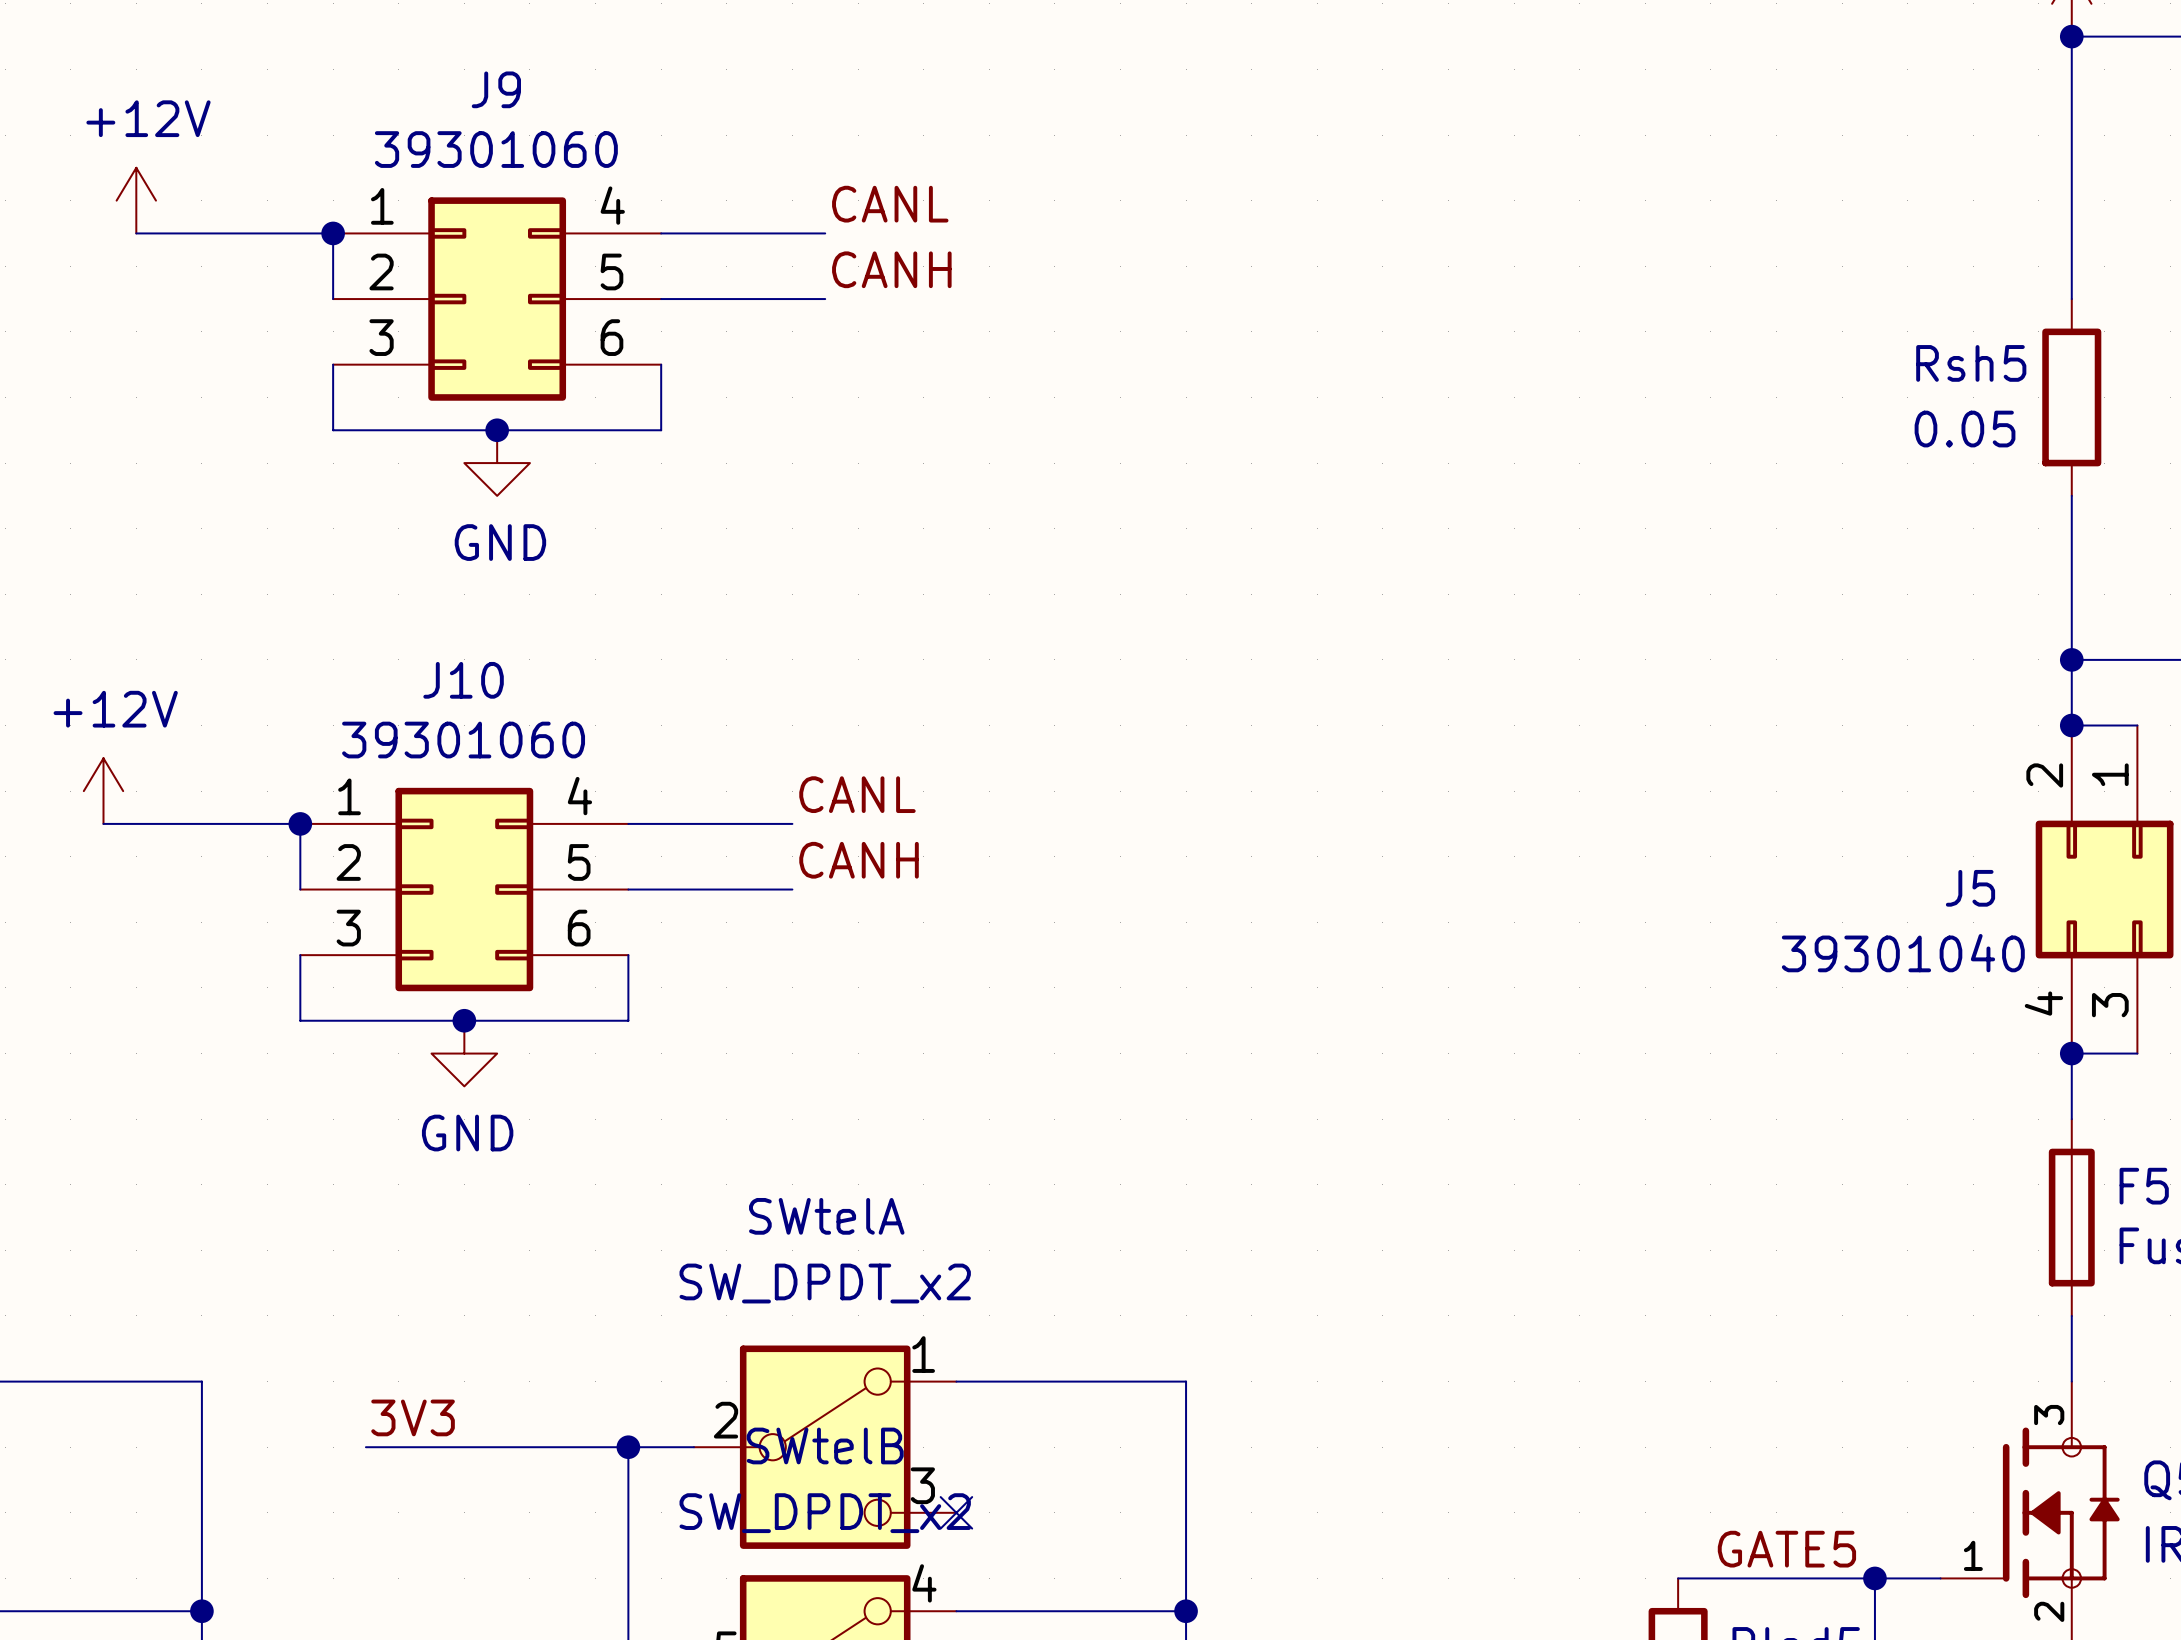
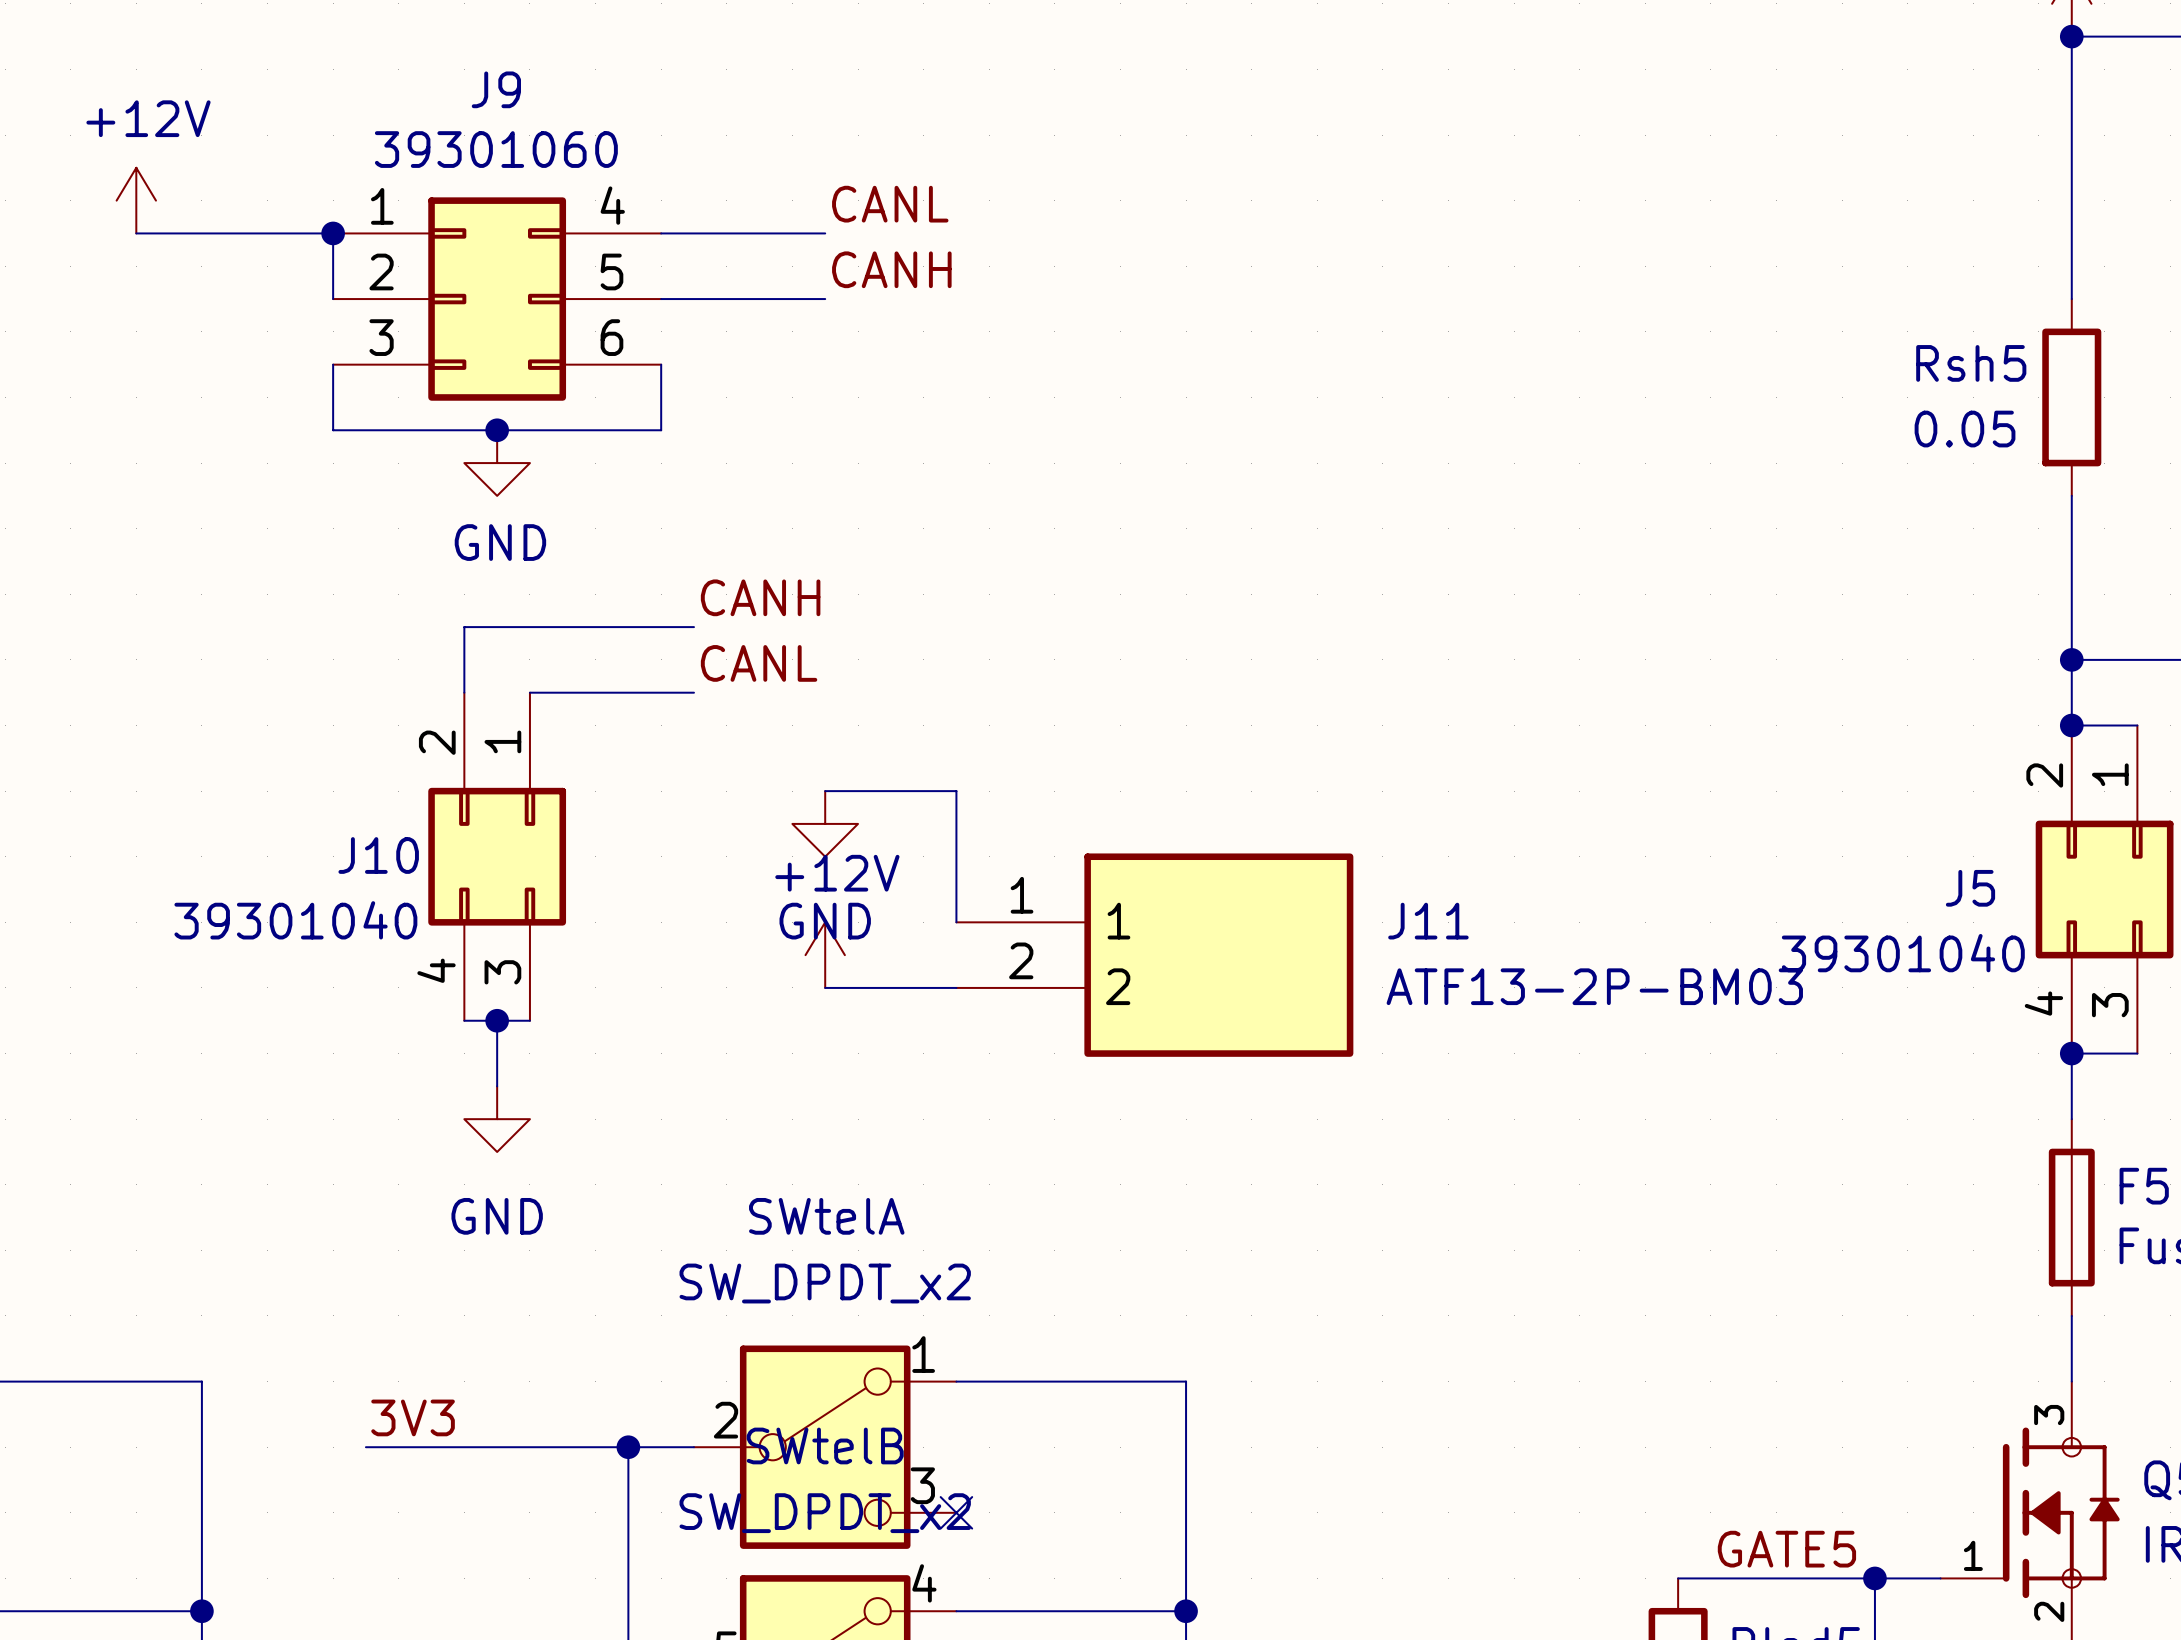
wire: none -> (693, 627) (464, 627) (464, 692)
J10 name position: J10 (463, 680) -> J10 (378, 855)
J10 value: 39301060 (463, 740) -> 39301040 (295, 920)
J10 symbol: [300, 787, 629, 992] -> [428, 692, 567, 1021]
power symbol: +12V (103, 791) -> none
wire: none -> (825, 791) (956, 791) (956, 922)
label position: CANL (857, 794) -> CANL (759, 663)
wire: (103, 823) (300, 823) (300, 889) -> none
junction: (300, 823) -> none
wire: (628, 823) (792, 823) -> (529, 692) (693, 692)
power symbol: none -> GND (825, 823)
label position: CANH (859, 860) -> CANH (760, 597)
wire: (628, 889) (792, 889) -> none
wire: (300, 955) (300, 1020) (464, 1020) -> none
wire: (628, 955) (628, 1020) (529, 1020) -> none
power symbol: none -> +12V (825, 955)
J11: none -> ATF13-2P-BM03 (1154, 955)
wire: none -> (825, 987) (956, 987)
junction position: (464, 1020) -> (497, 1020)
wire: none -> (497, 1020) (497, 1086)
power symbol position: GND (464, 1053) -> GND (497, 1119)
power symbol text position: GND (467, 1133) -> GND (497, 1216)

